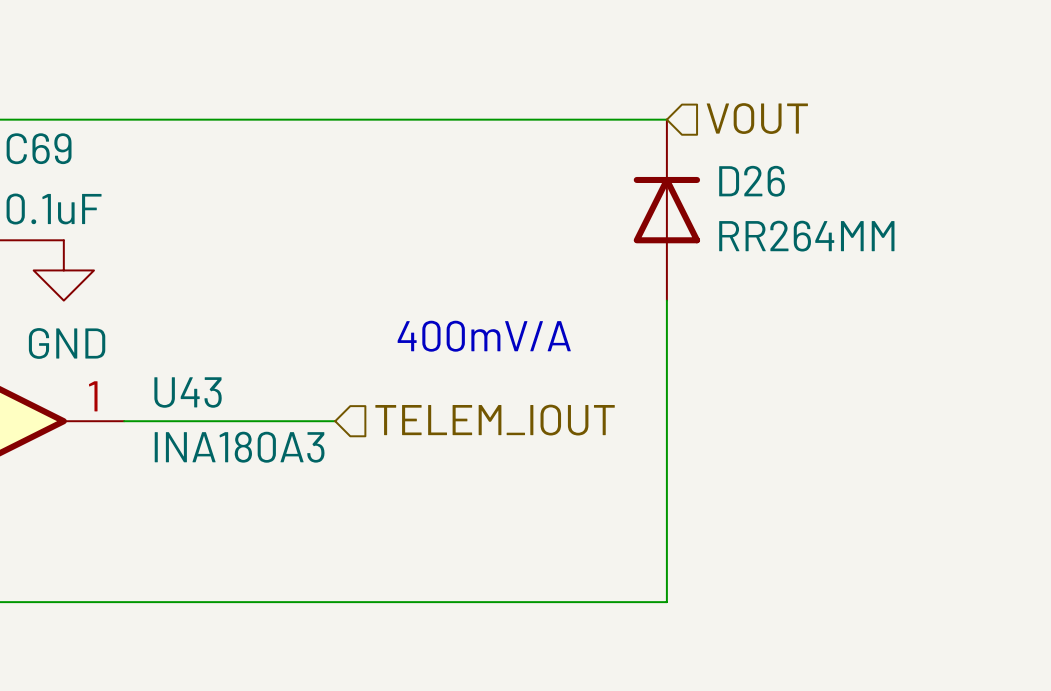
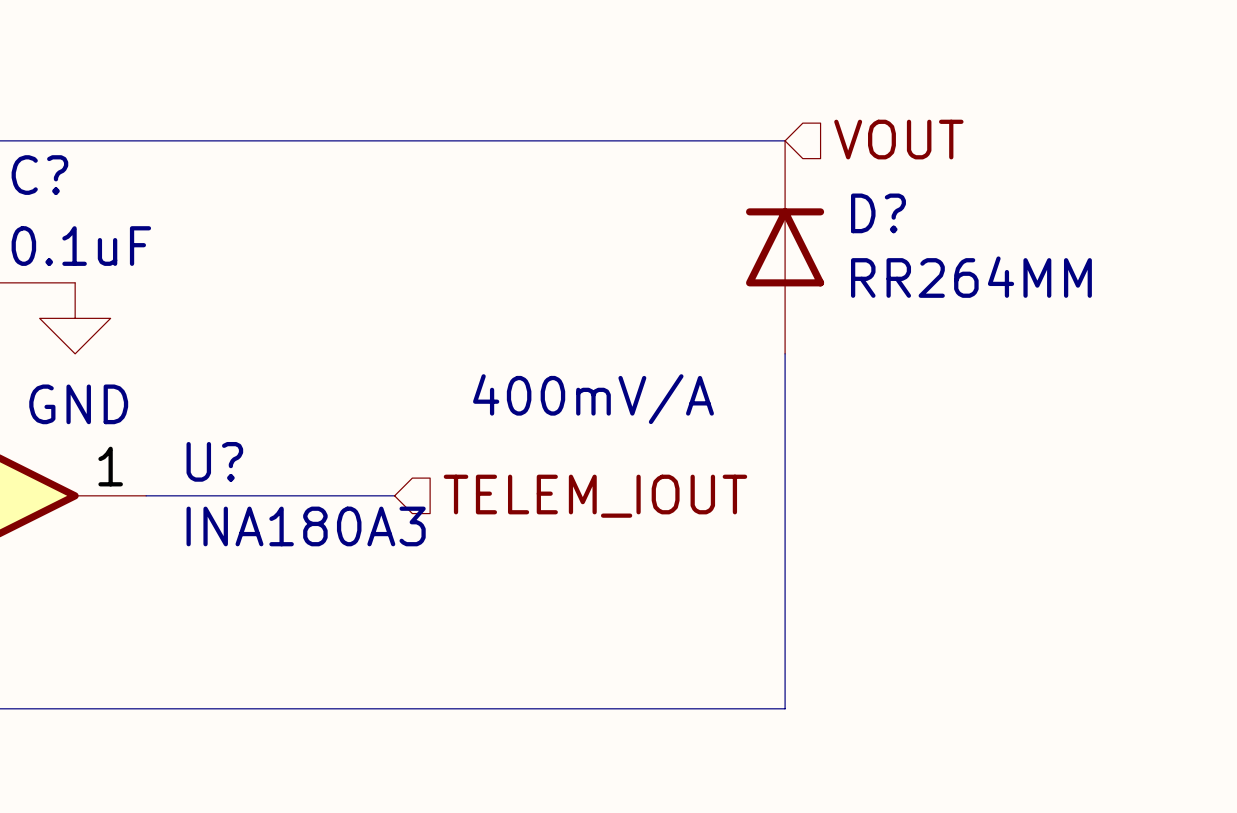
C69 name: C69 (39, 148) -> C? (39, 175)
D26 name: D26 (752, 181) -> D? (878, 213)
U43 name: U43 (188, 392) -> U? (214, 461)

